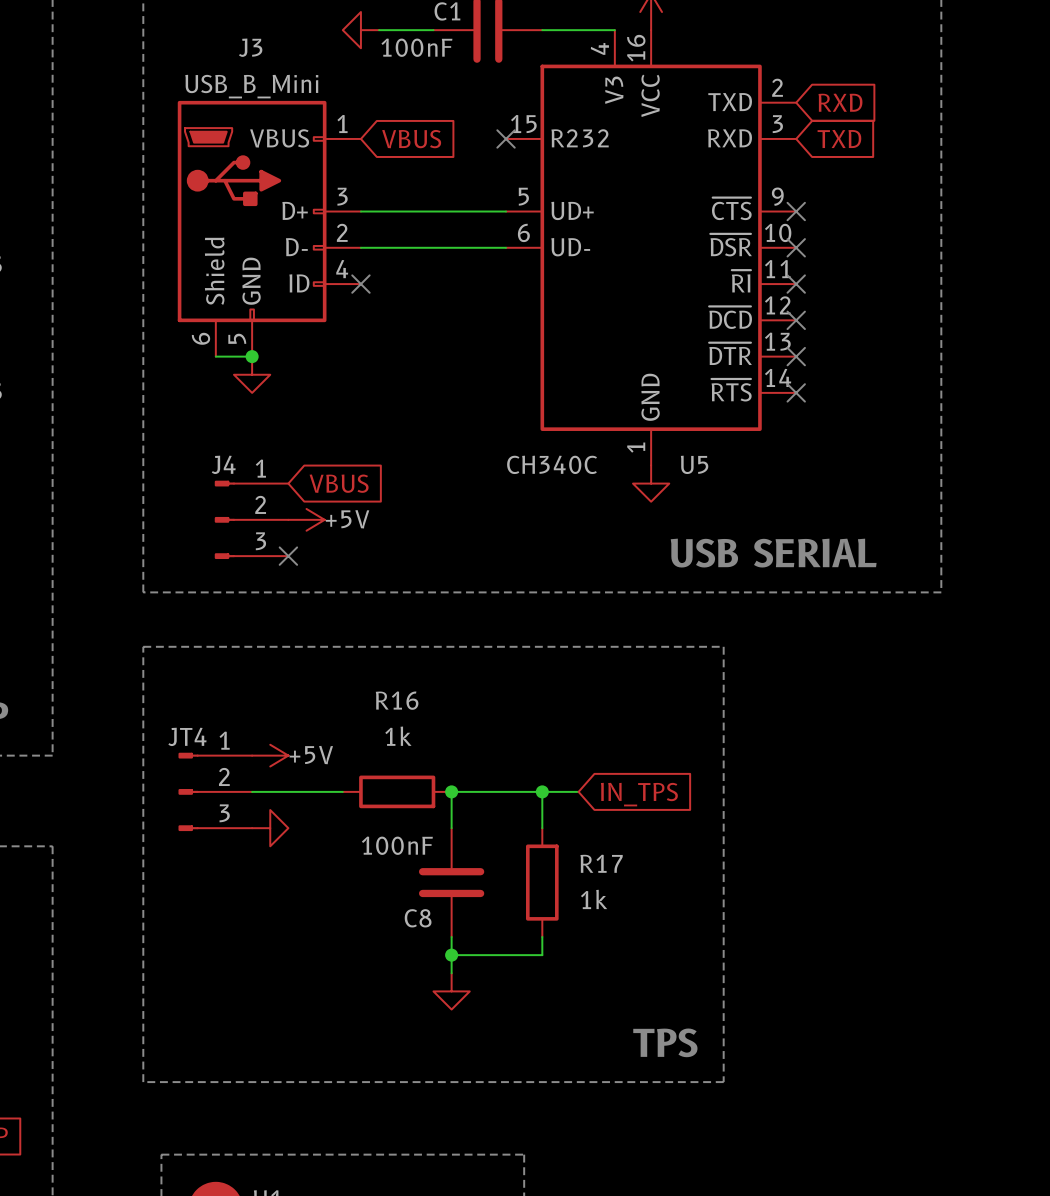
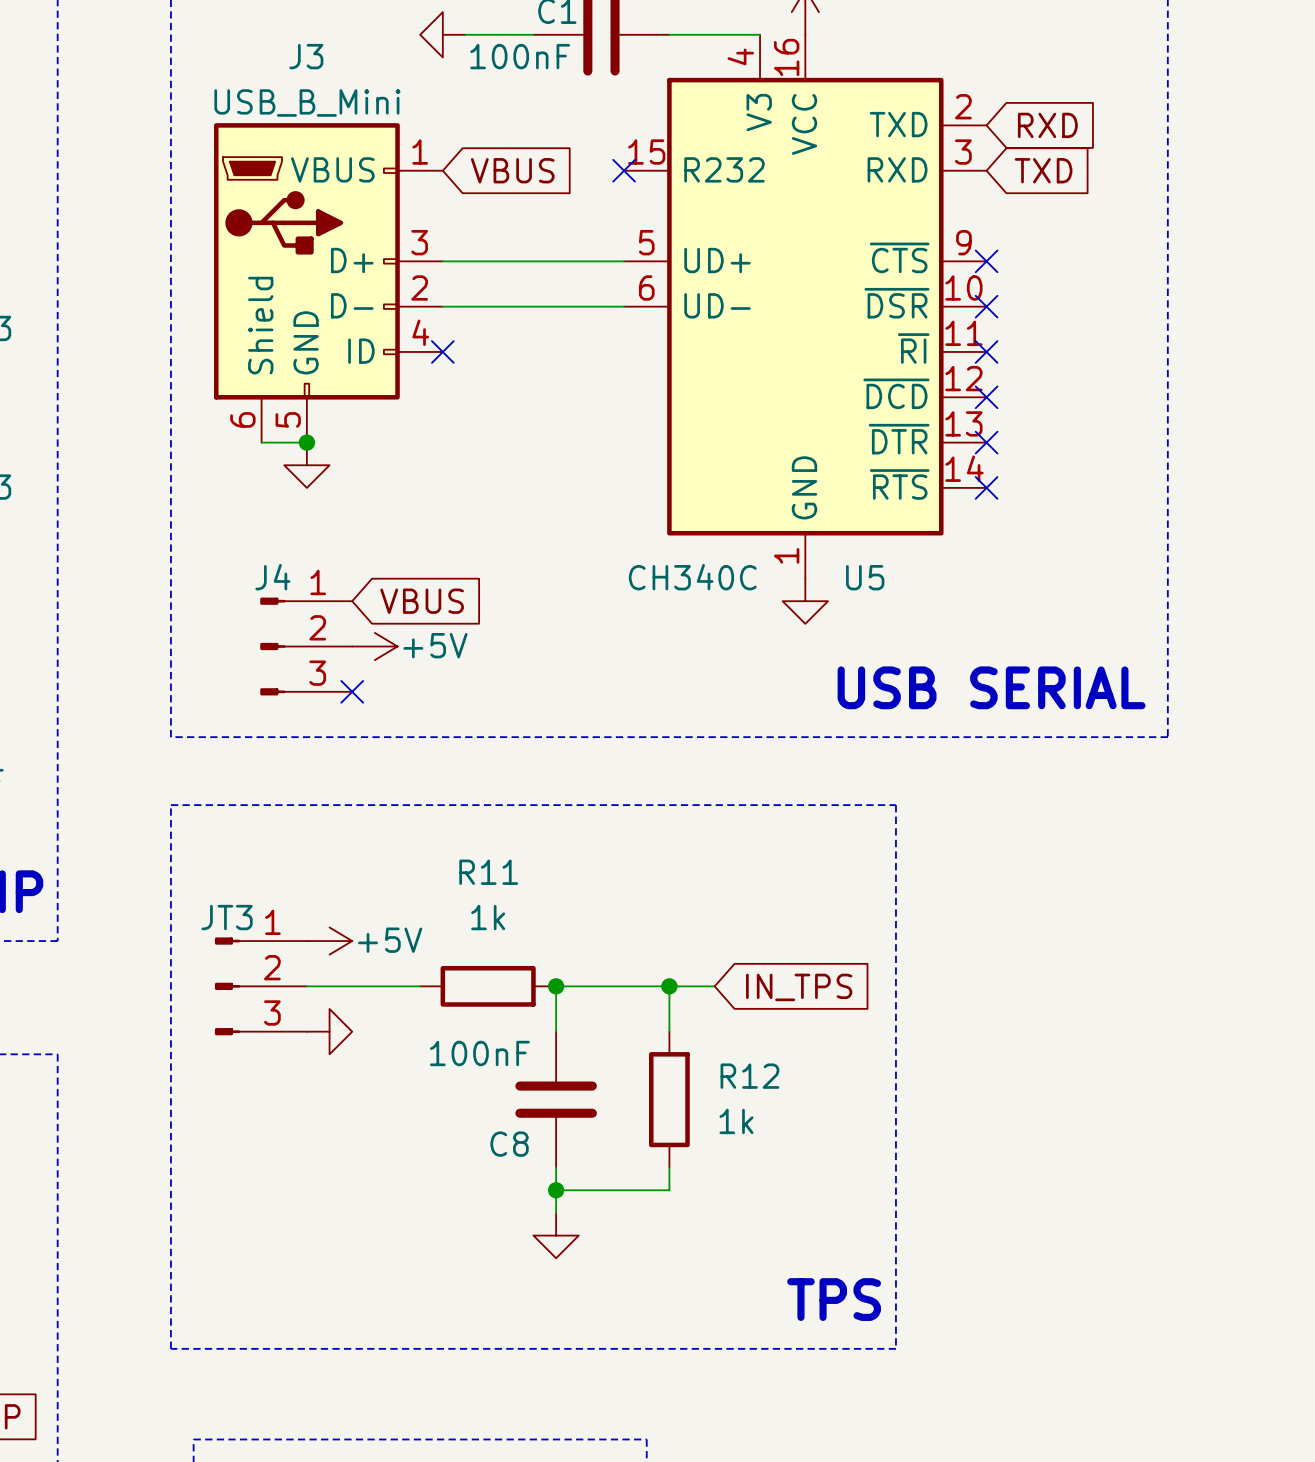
R16 name: R16 (397, 700) -> R11 (488, 872)
JT4 name: JT4 (187, 736) -> JT3 (227, 917)
R17 name: R17 (601, 863) -> R12 (749, 1076)

